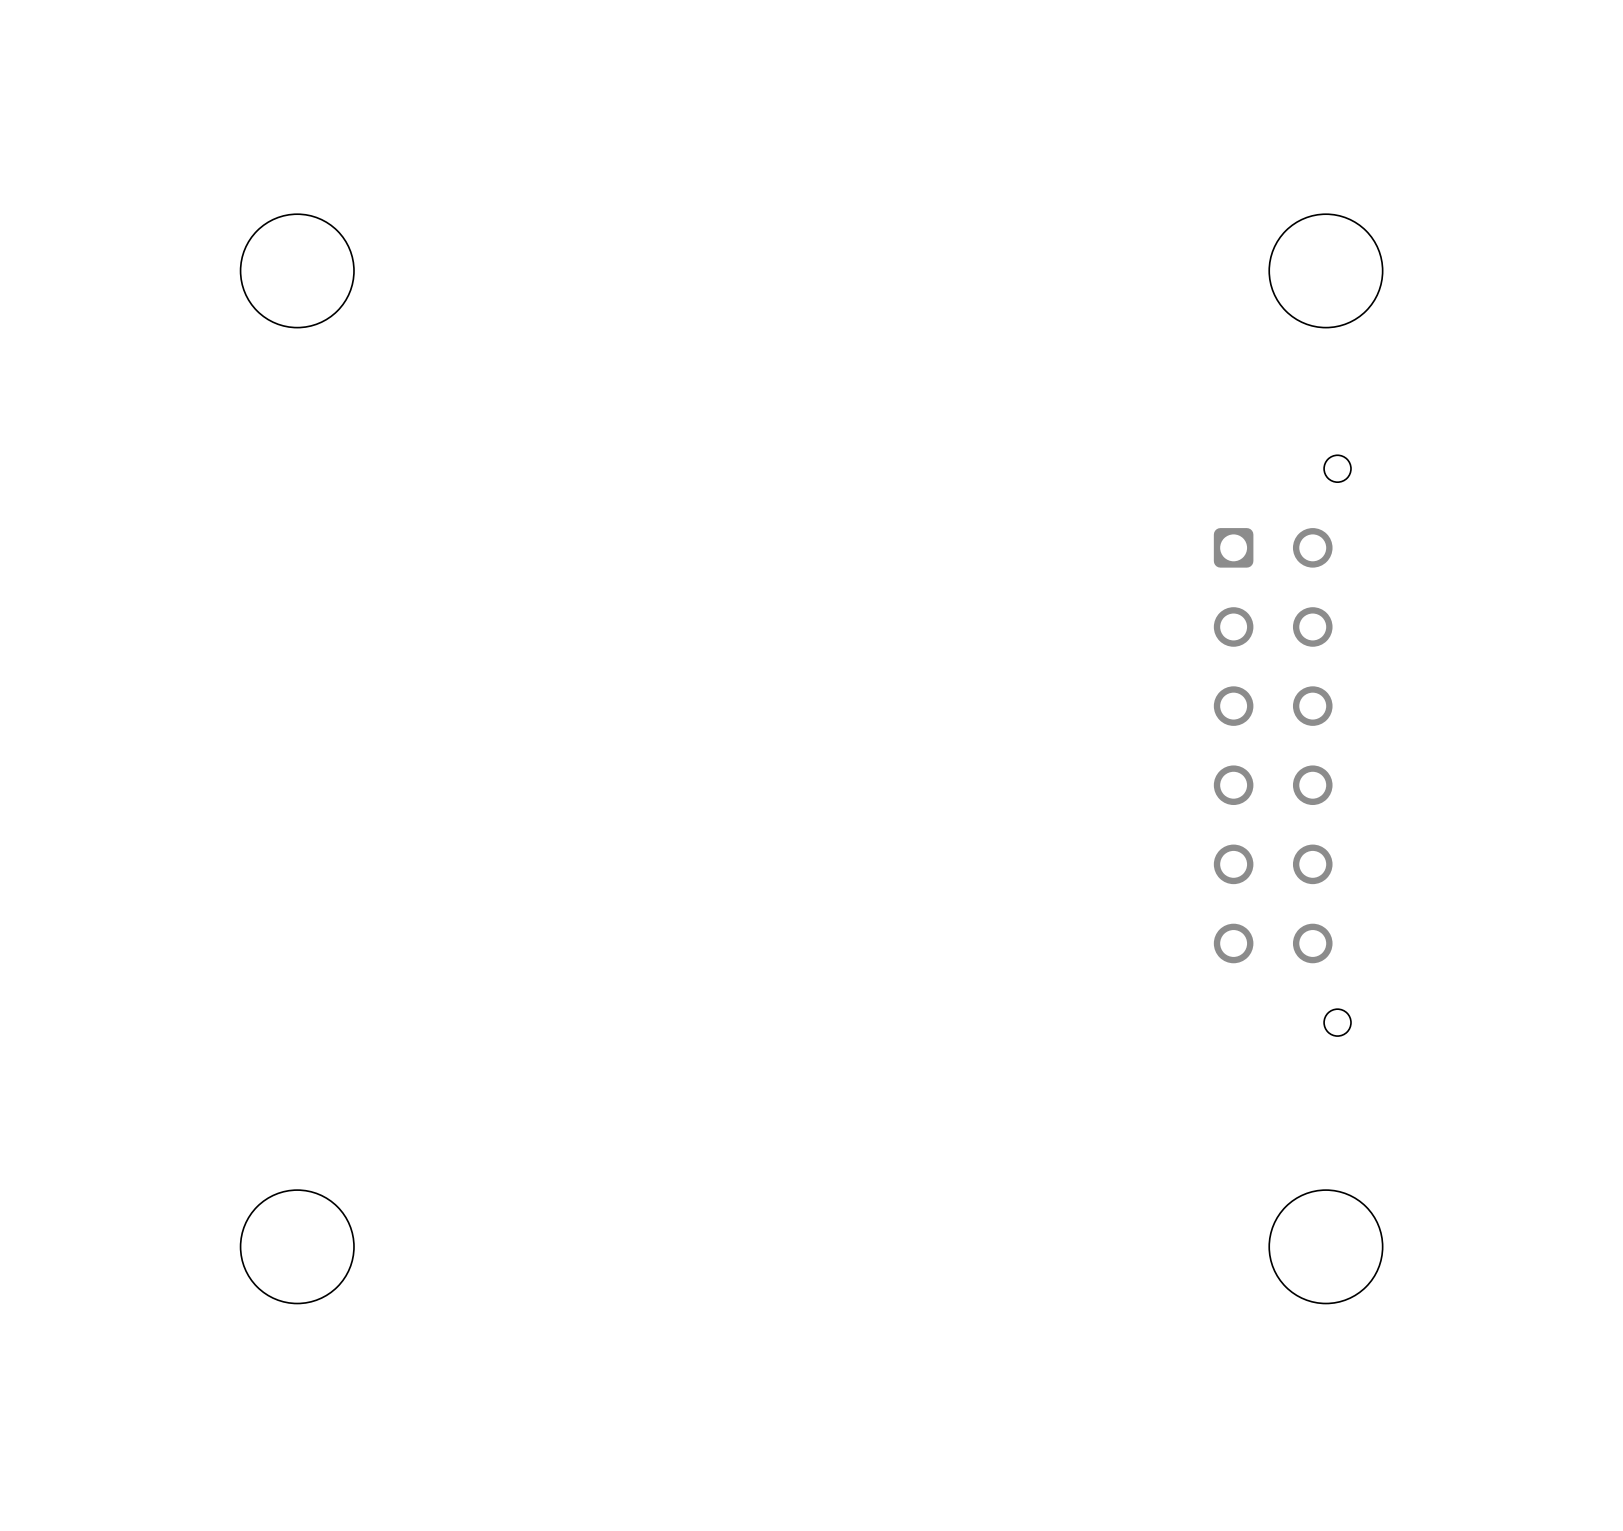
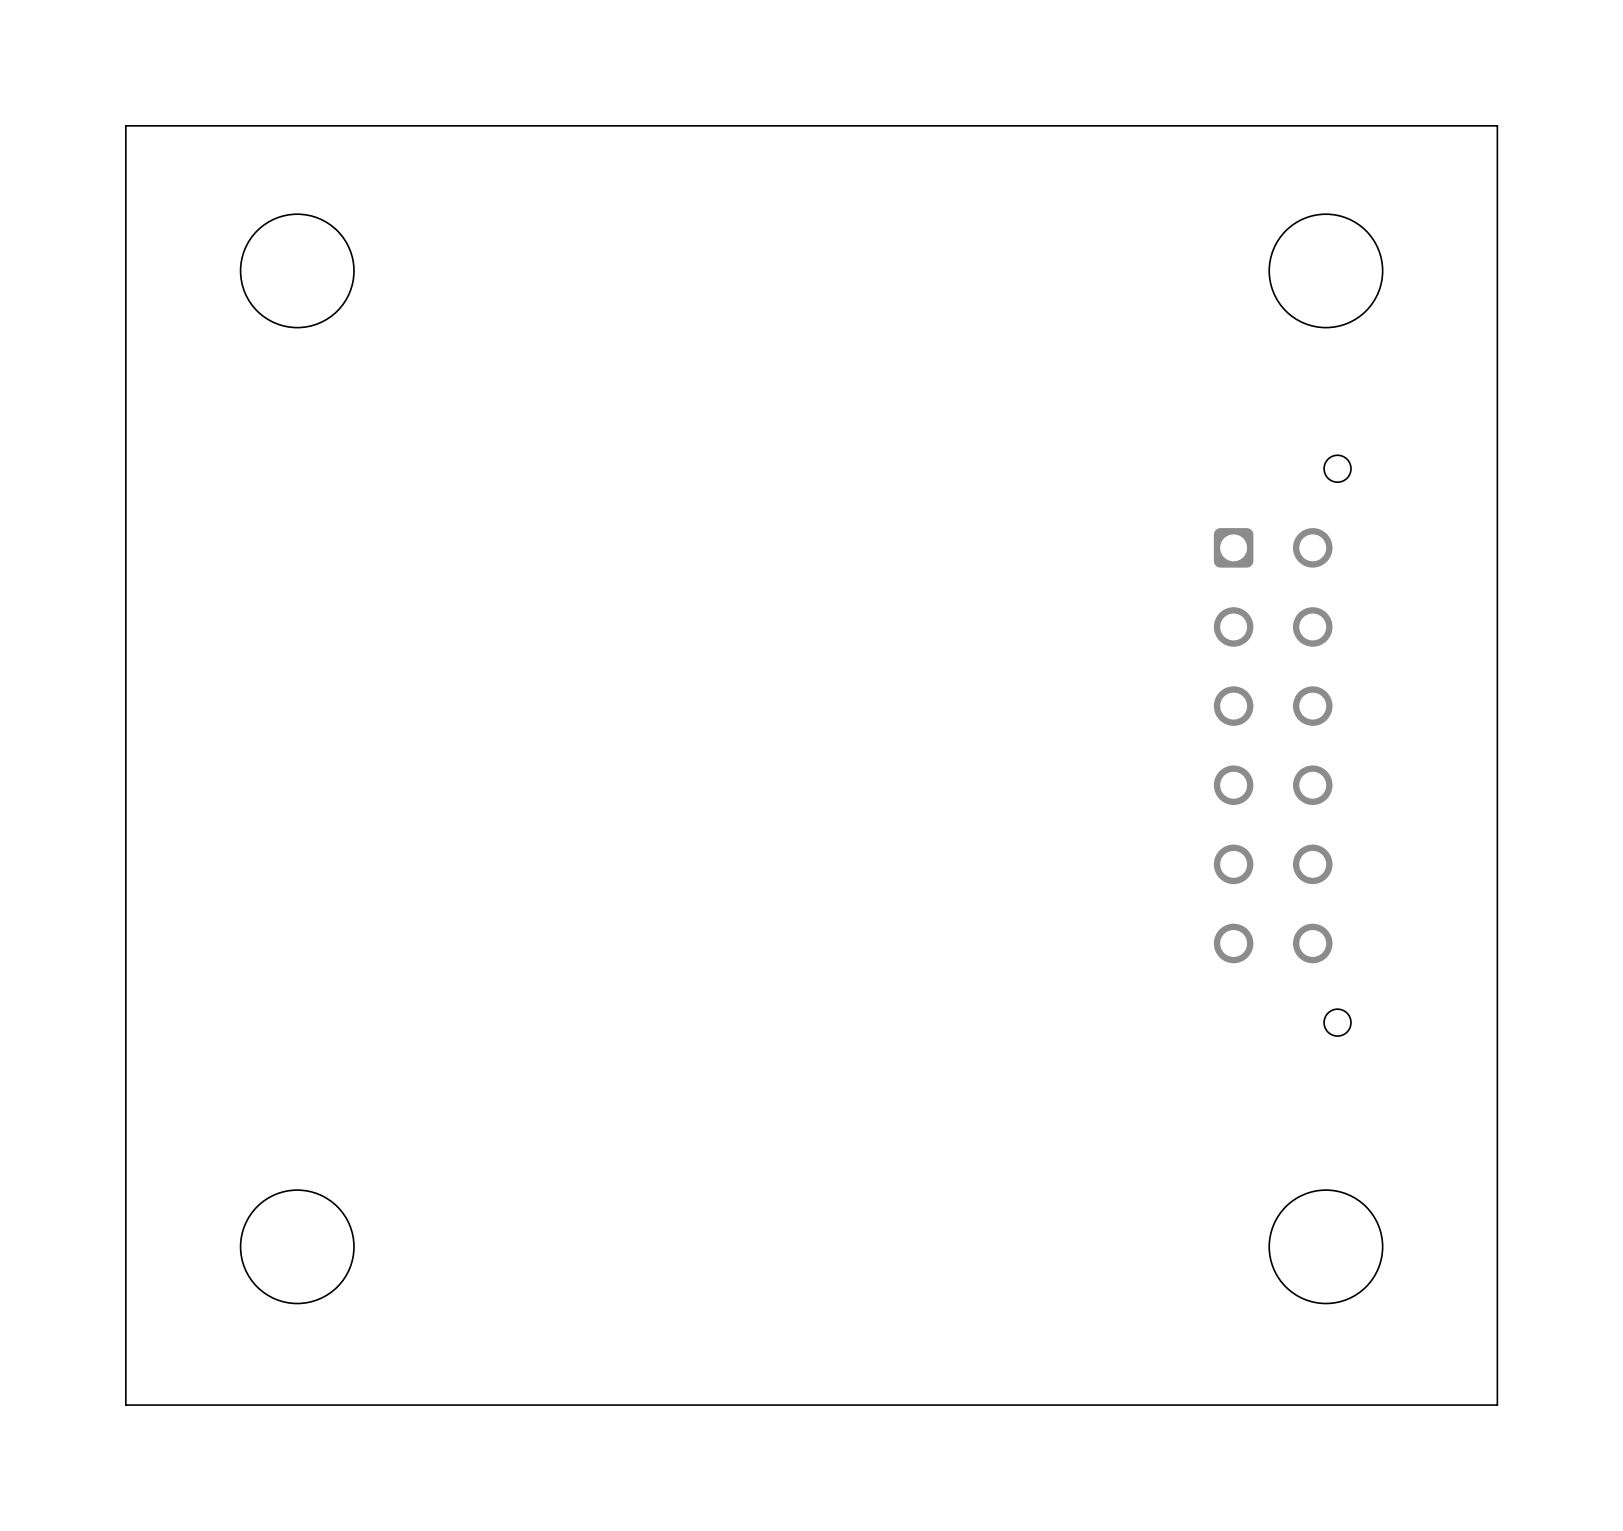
board edge: none -> (1497, 125) (125, 125) (125, 1405) (1497, 1405) (1497, 125)

